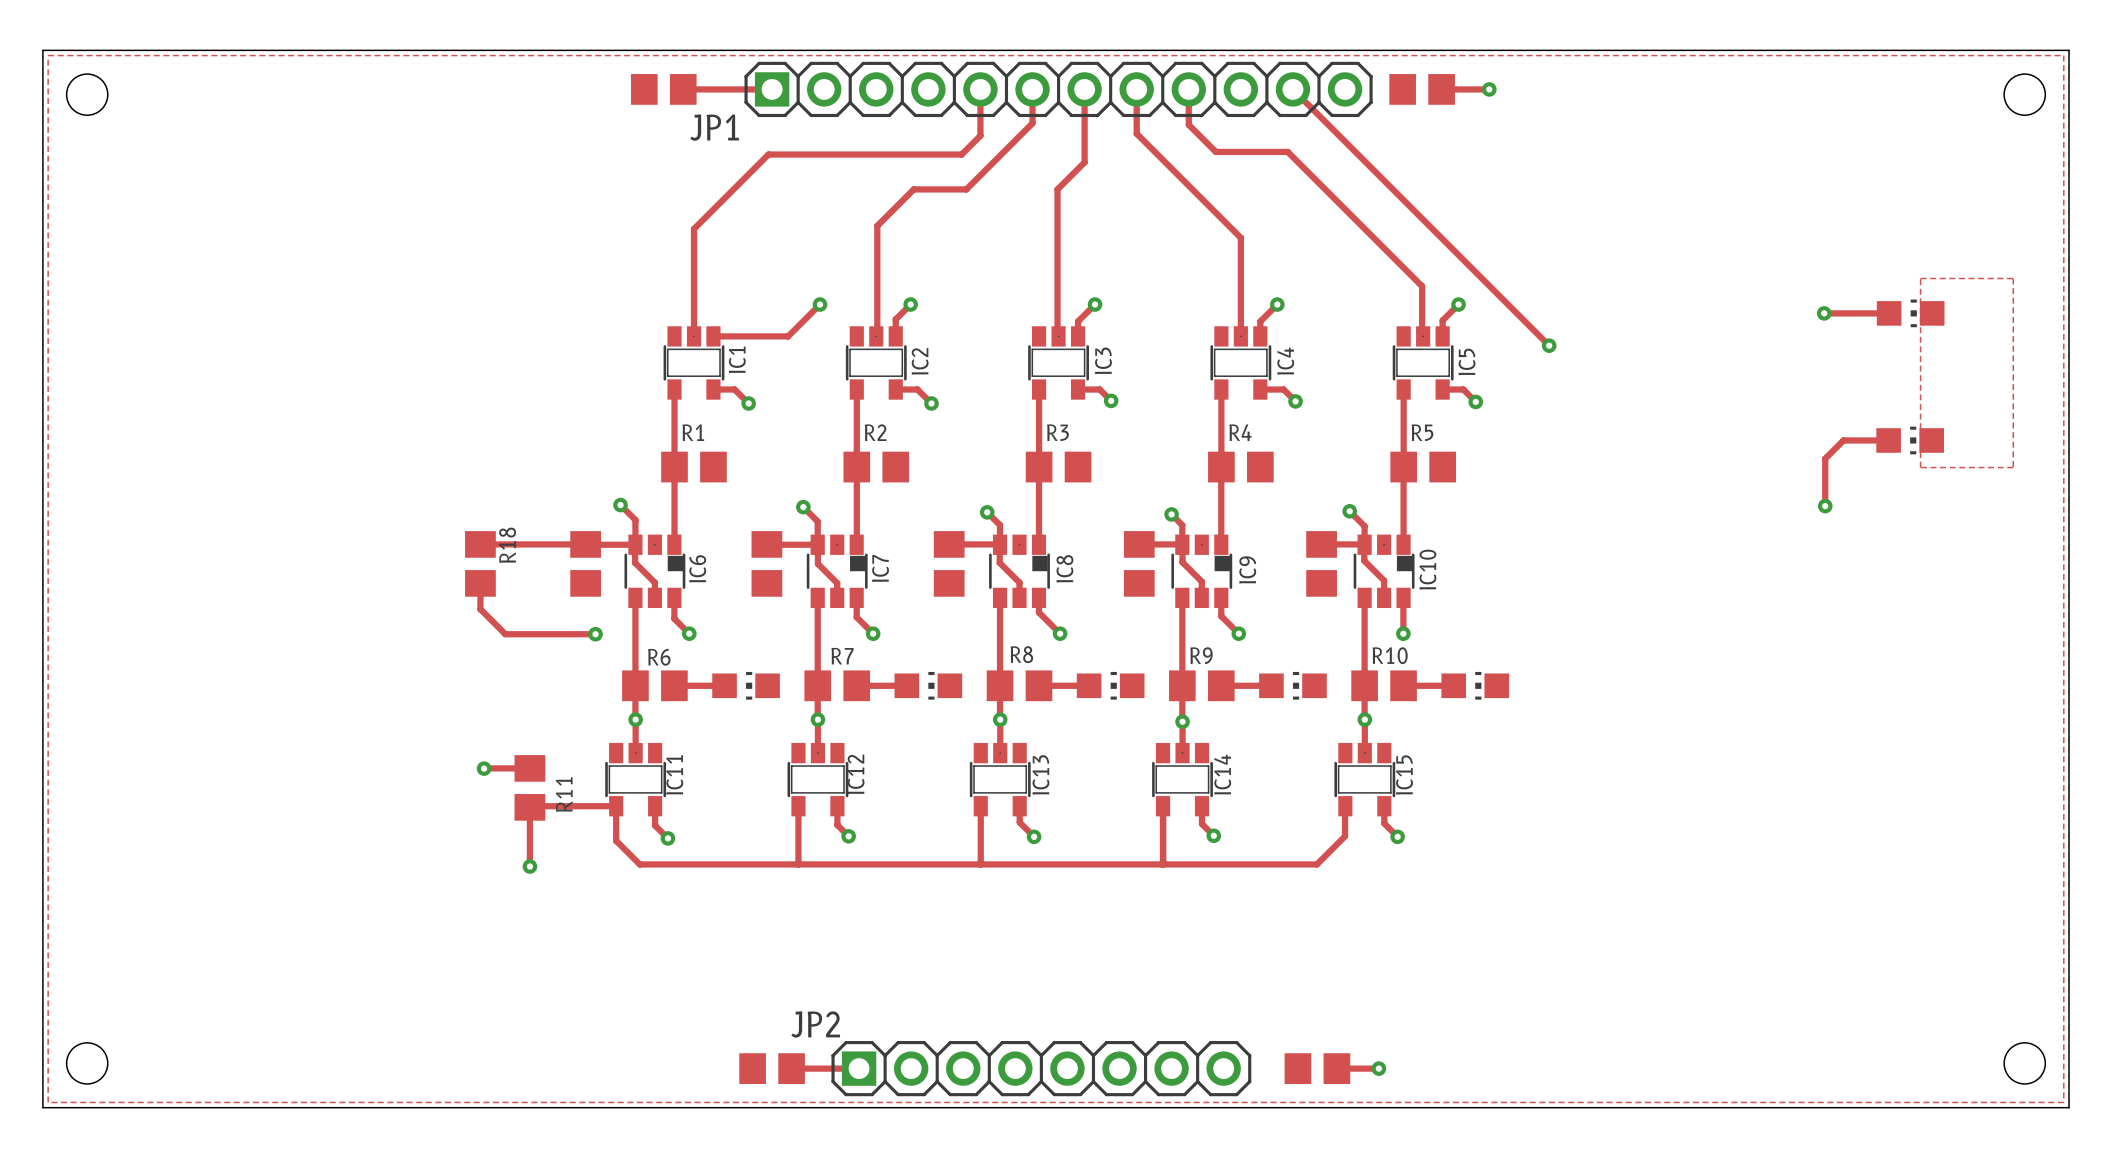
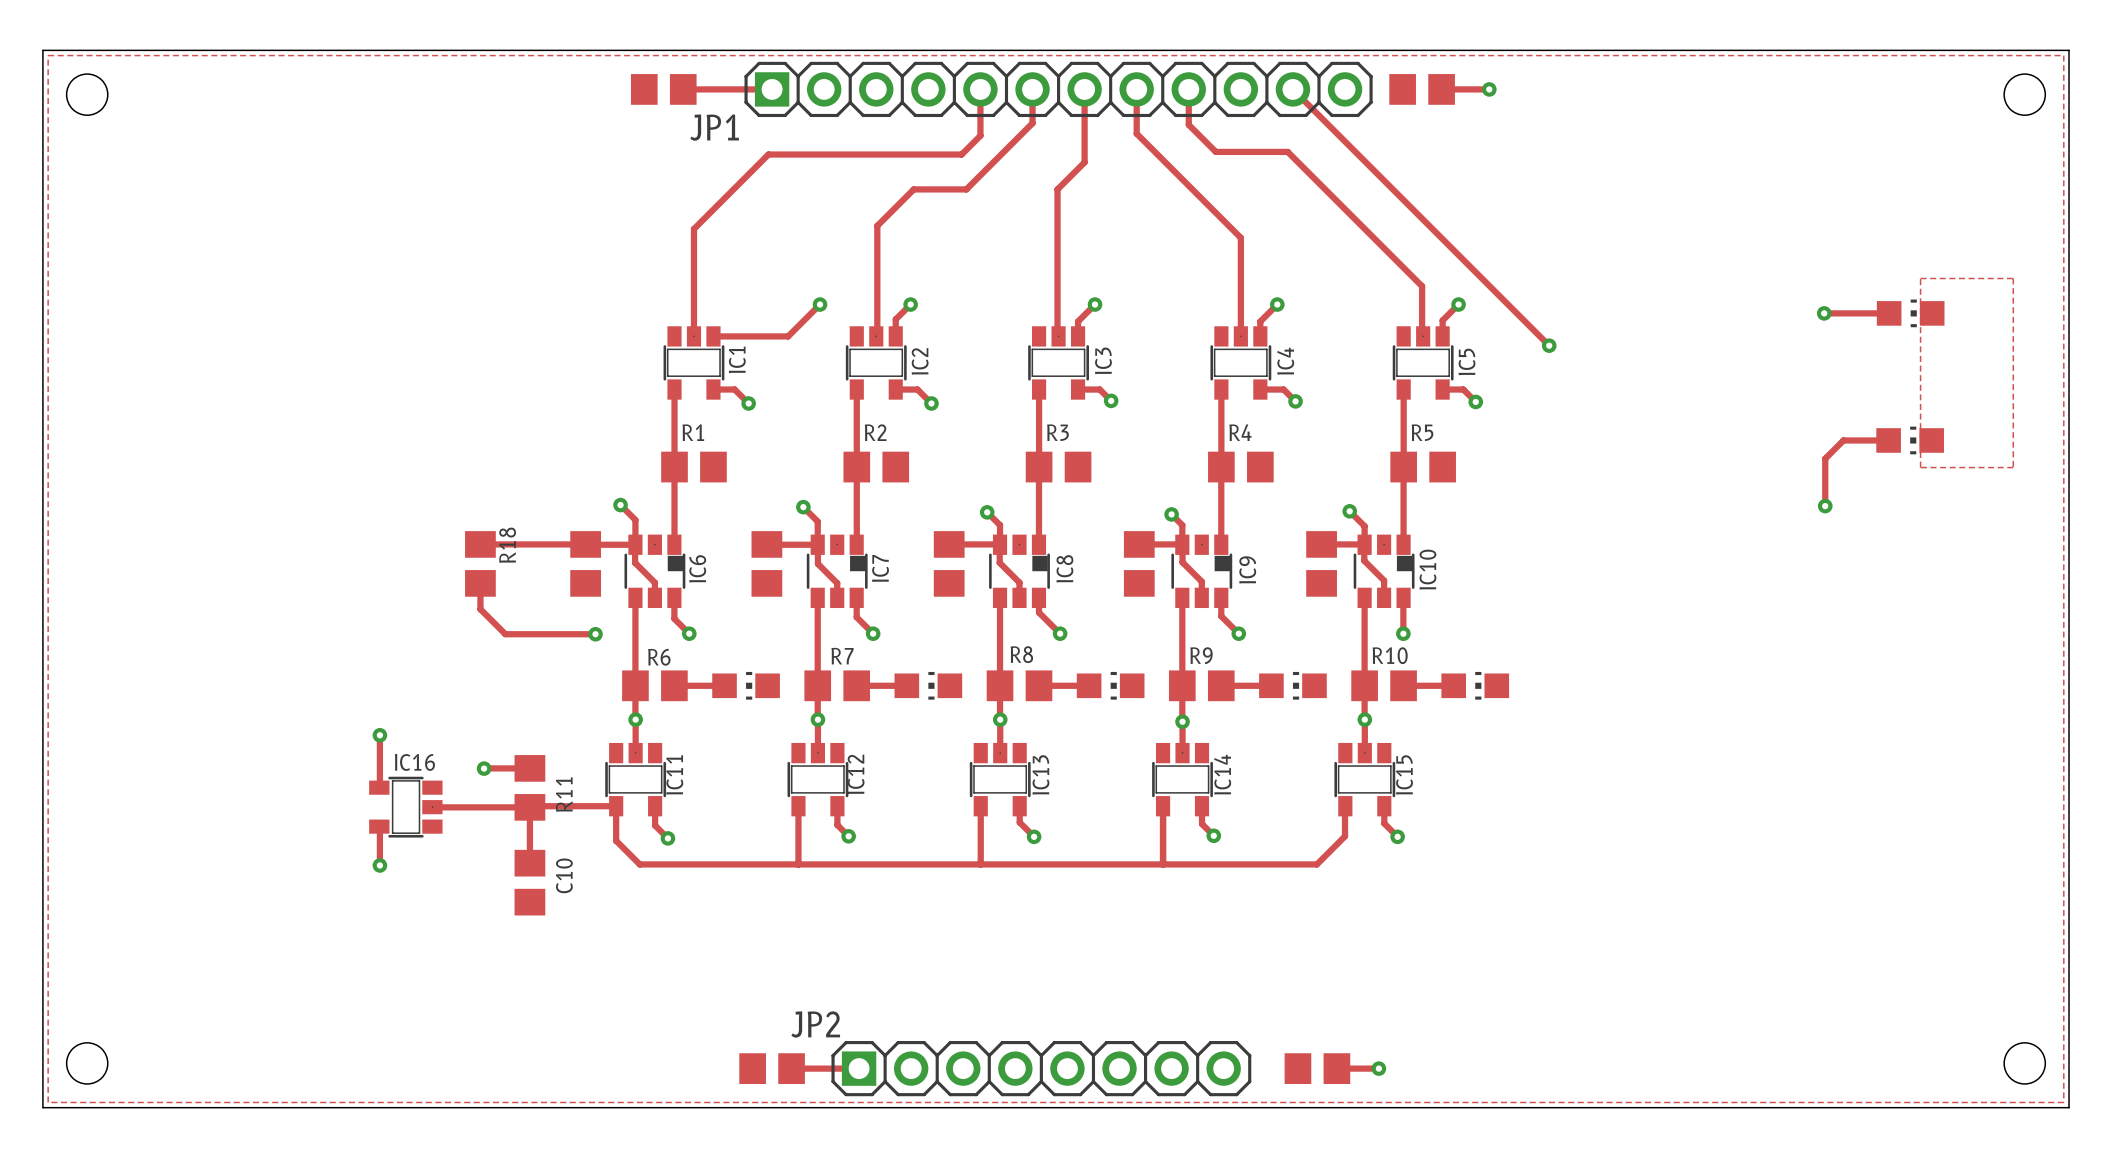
track: none -> (379, 735) (379, 787)
via: none -> (379, 735)
IC16: none -> (405, 807)
track: none -> (432, 807) (529, 807)
track: none -> (379, 826) (379, 865)
via: none -> (379, 865)
via: (529, 866) -> none
C10: none -> (529, 882)

